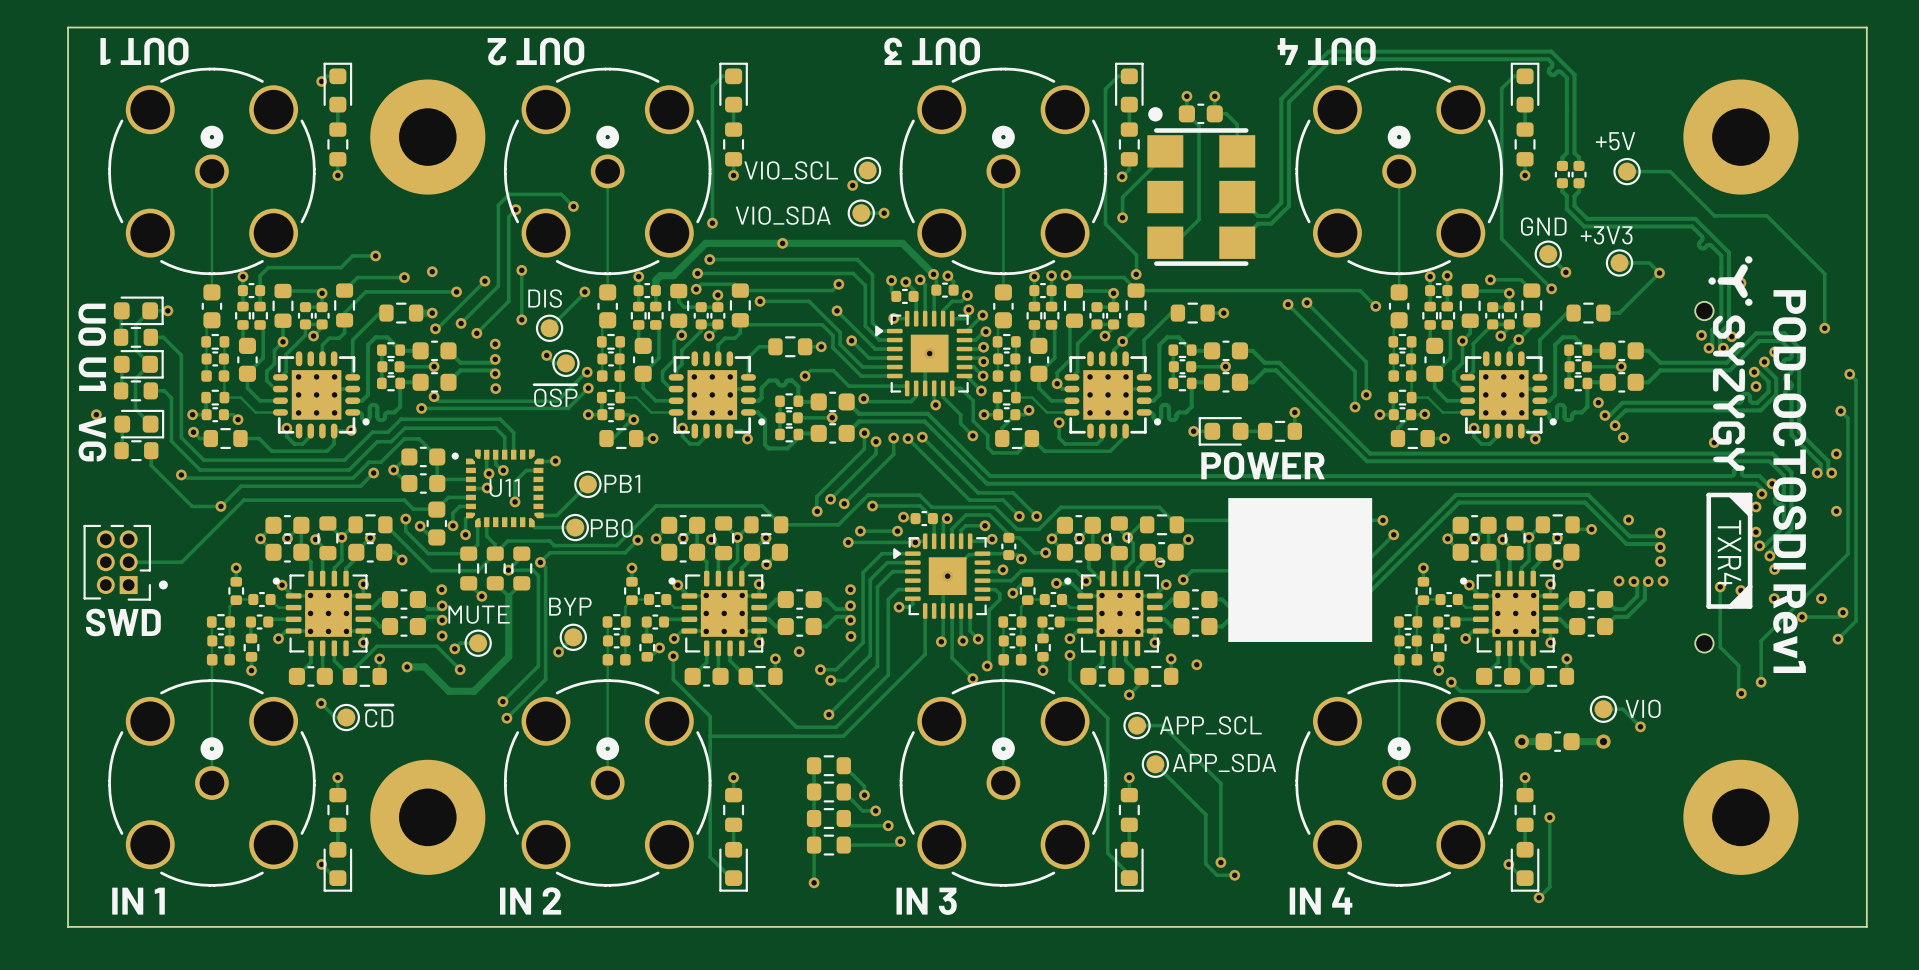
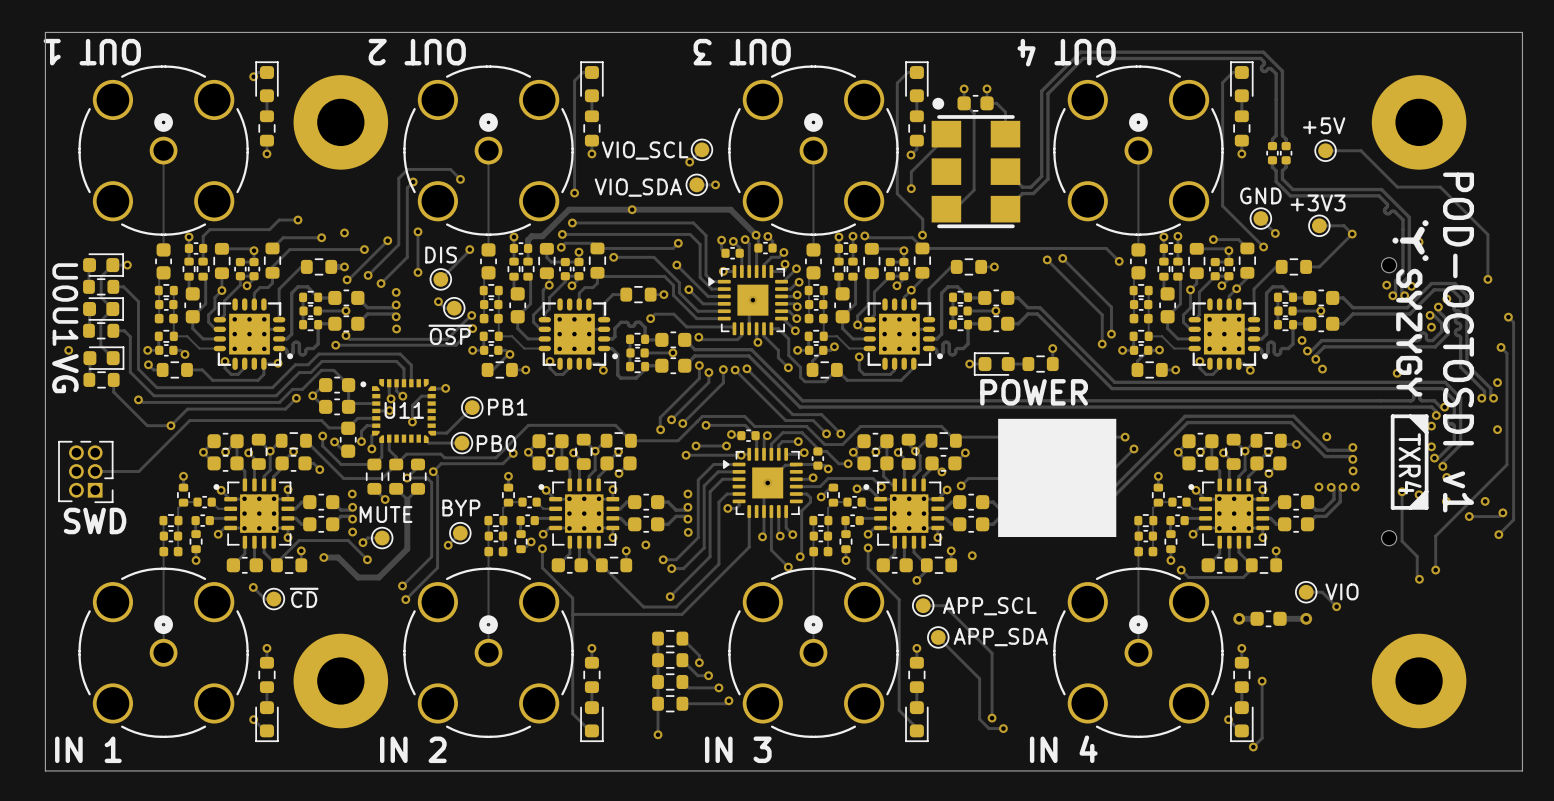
text: POD-OCTOSDI Rev1 (1789, 481) -> POD-OCTOSDI v1 (1458, 342)
drawing: [158, 580, 168, 590] -> none

